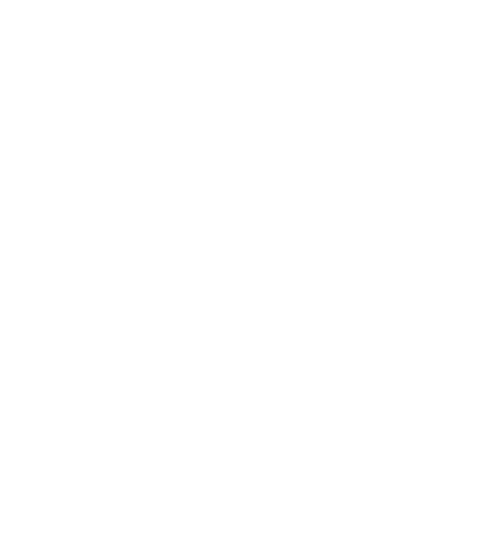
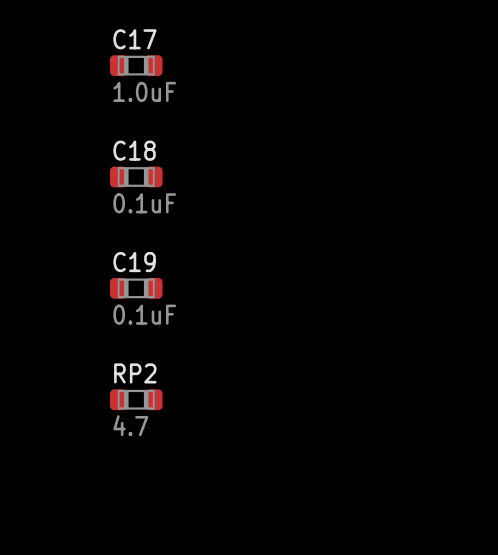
C17: none -> 1.0uF (136, 65)
C18: none -> 0.1uF (136, 176)
C19: none -> 0.1uF (136, 288)
RP2: none -> 4.7 (136, 399)

